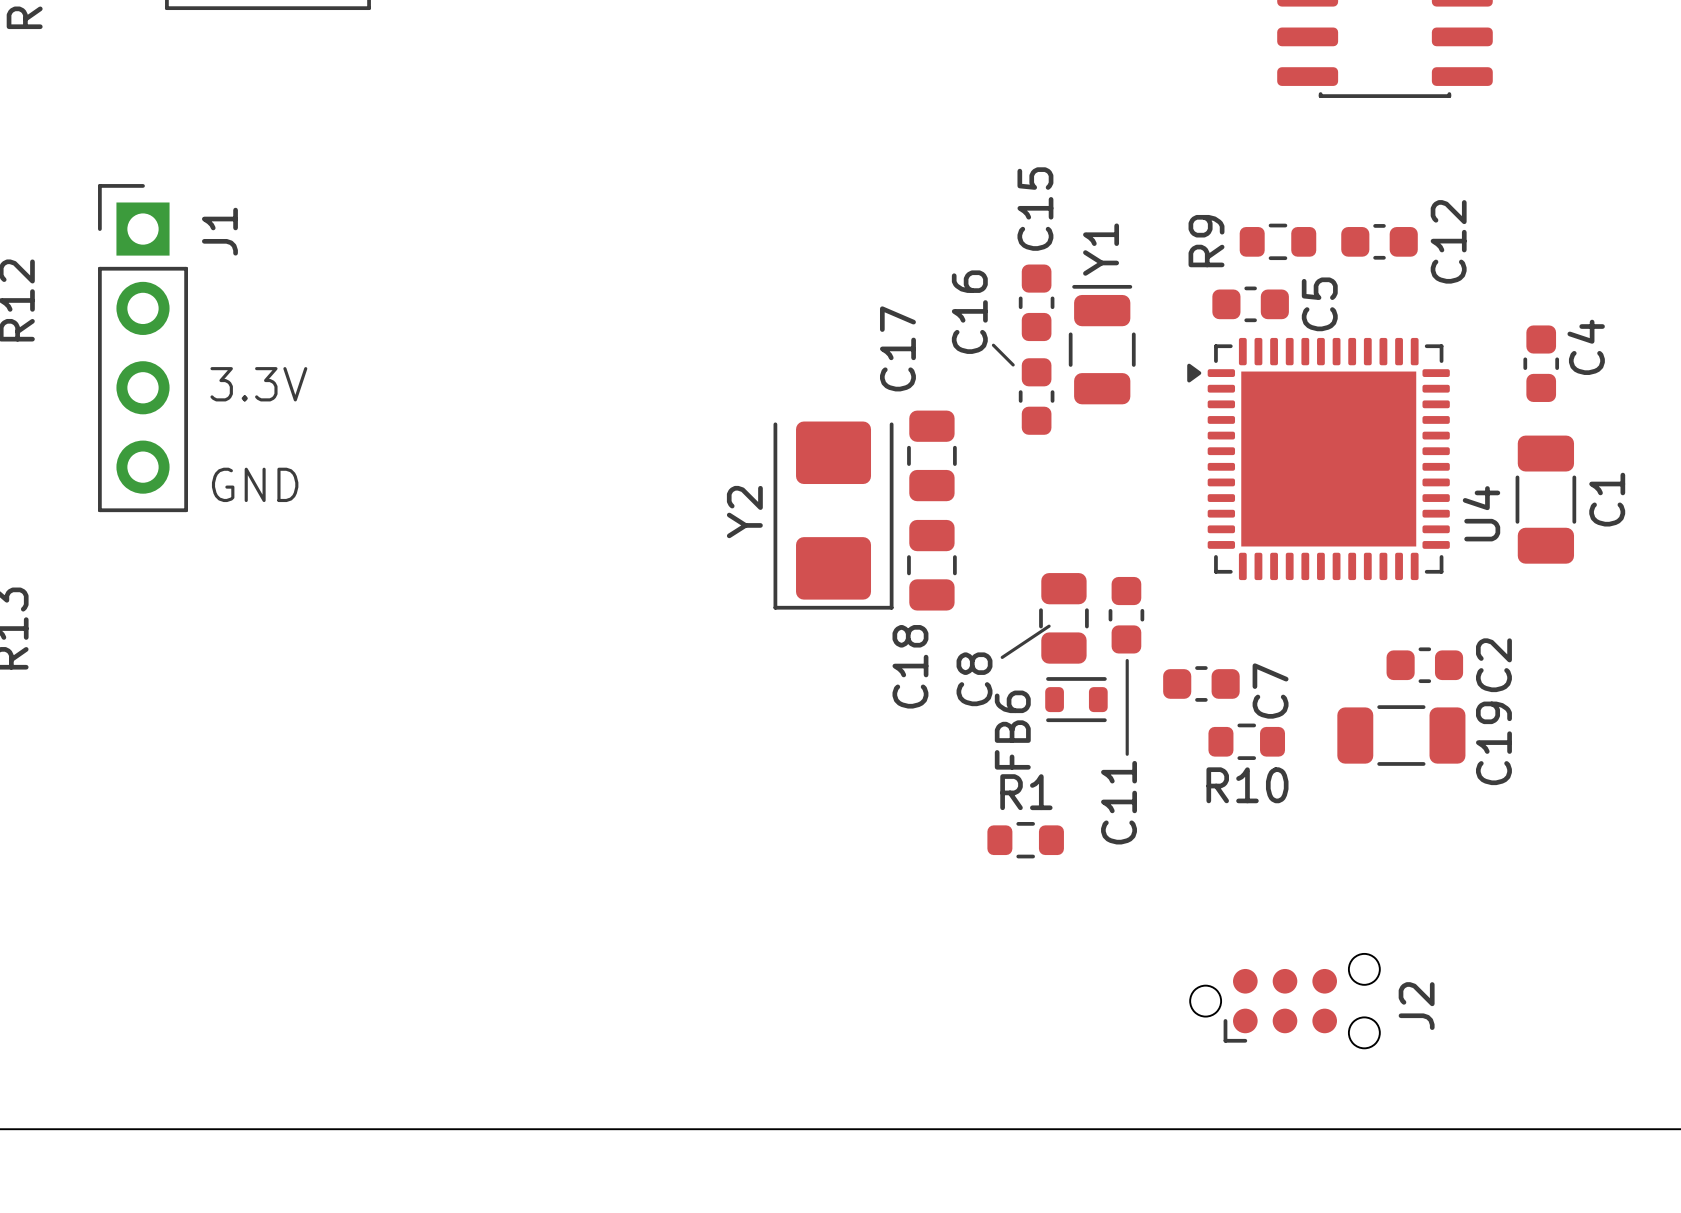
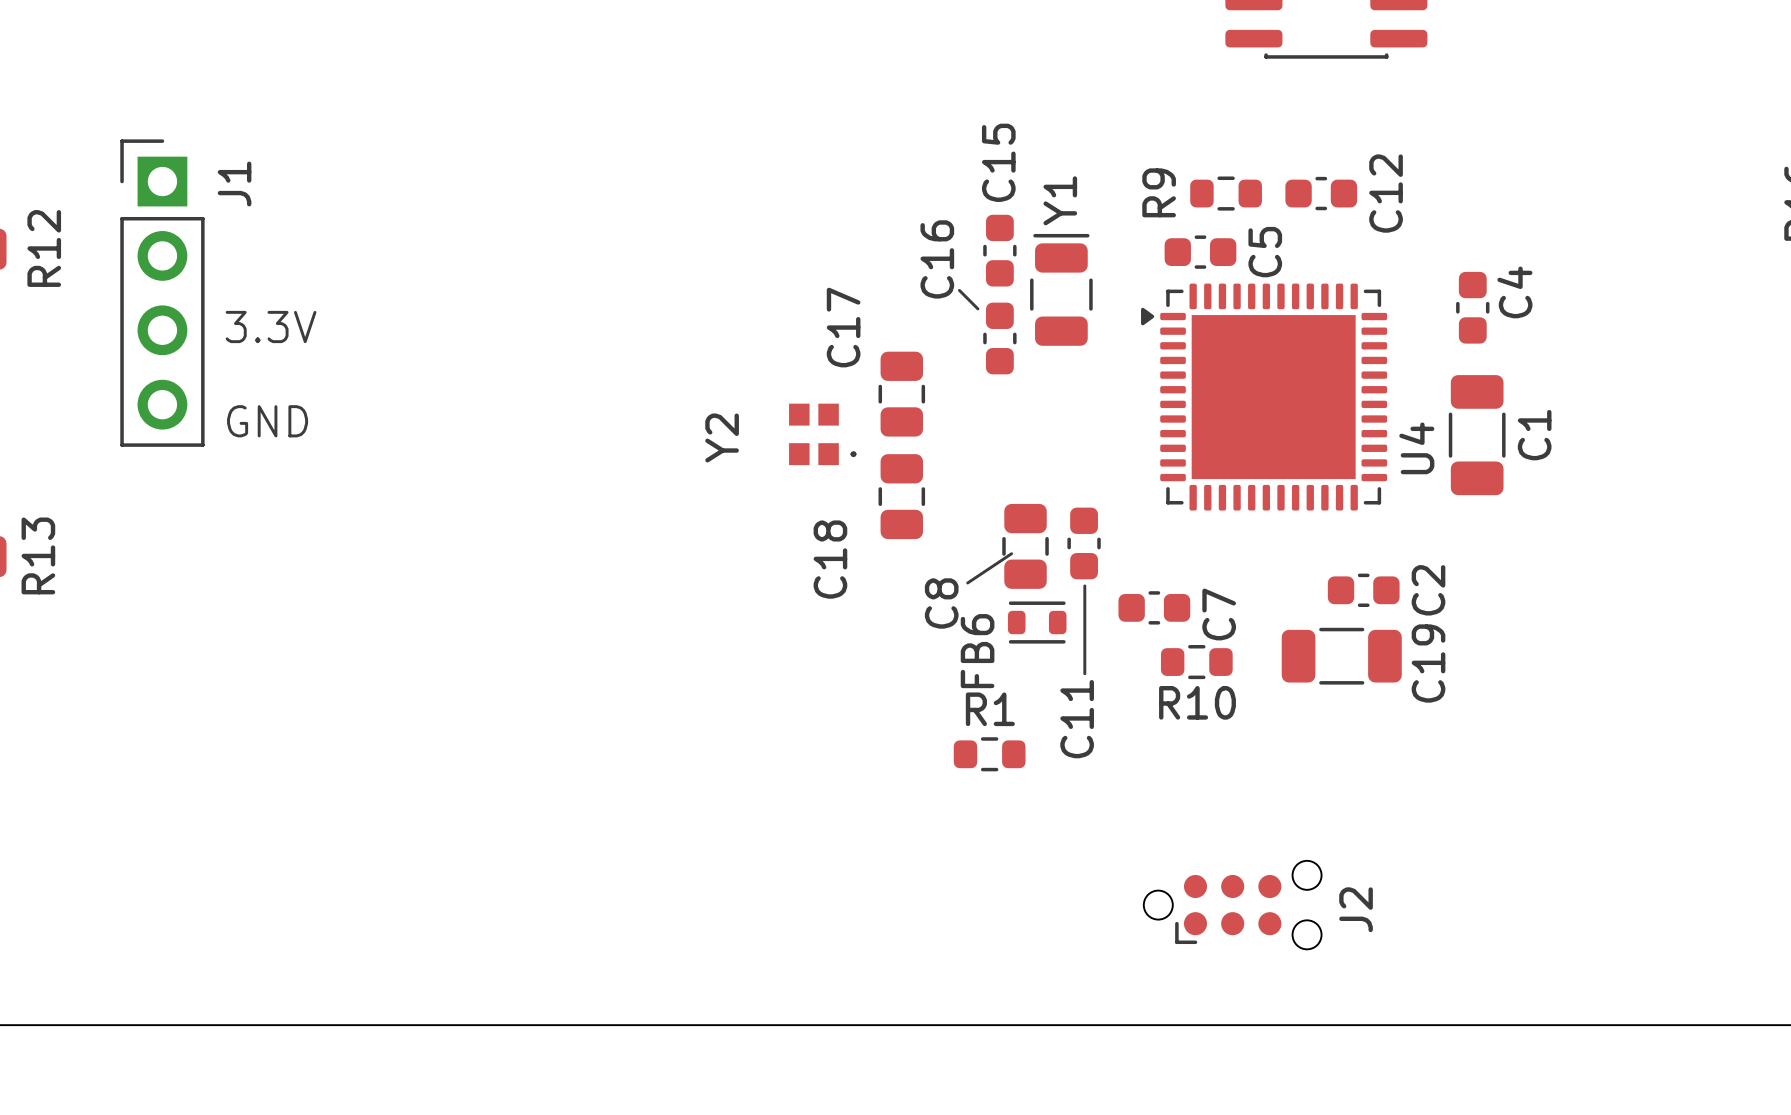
C17 name position: C17 (897, 348) -> C17 (843, 327)
Y2 footprint: [773, 421, 894, 610] -> [789, 403, 857, 466]
C18 name position: C18 (910, 666) -> C18 (830, 559)

